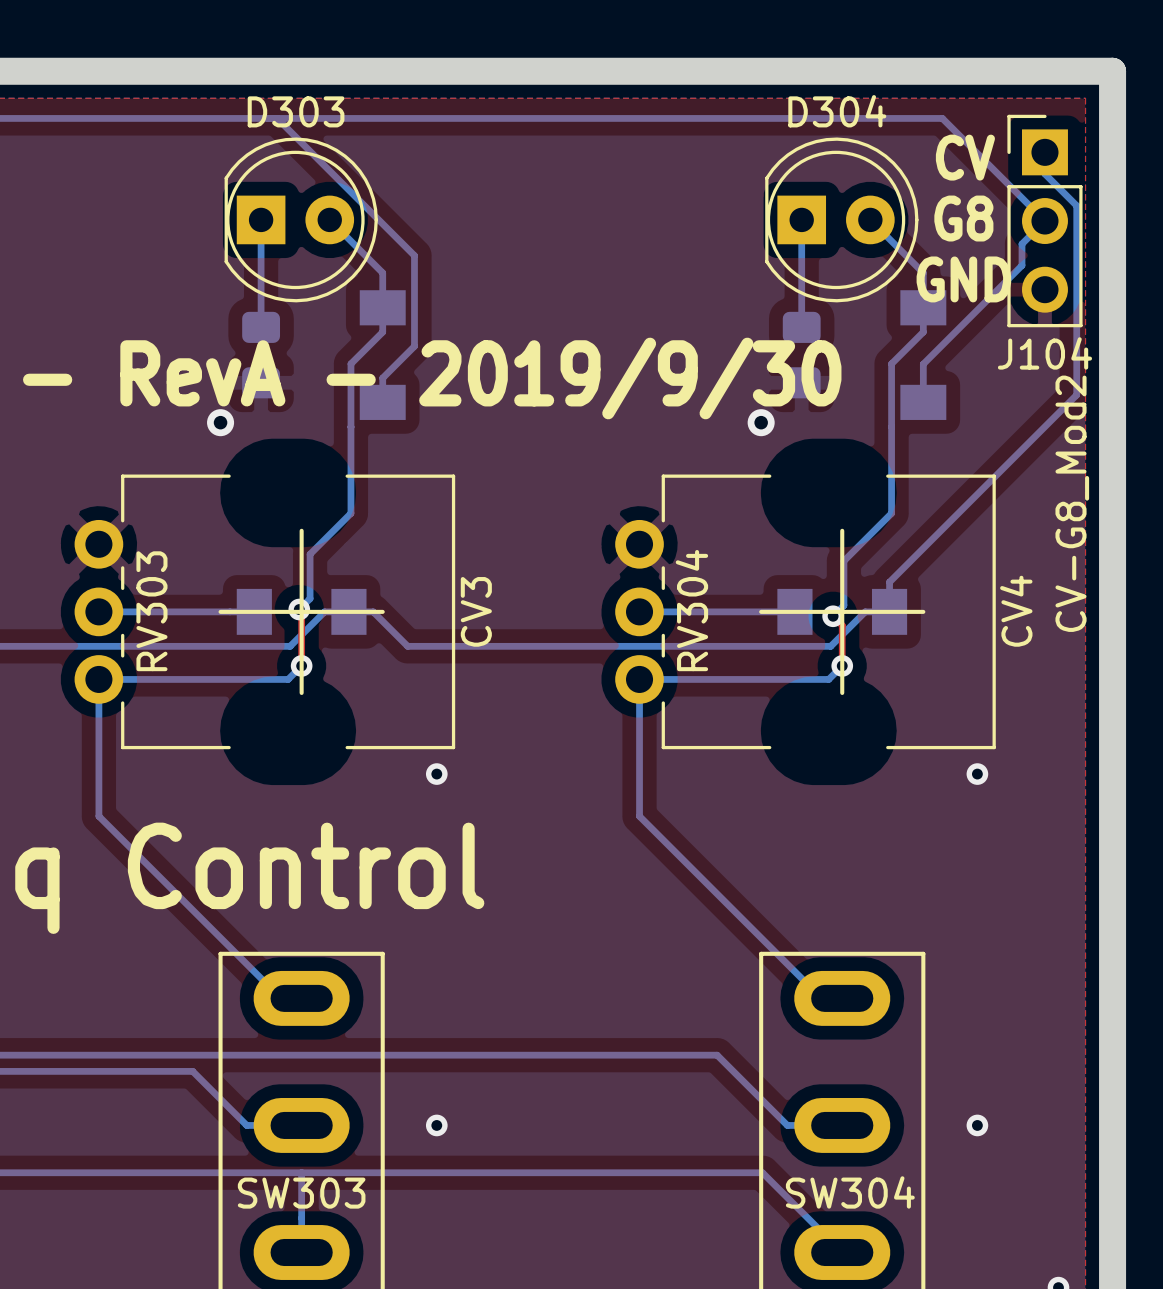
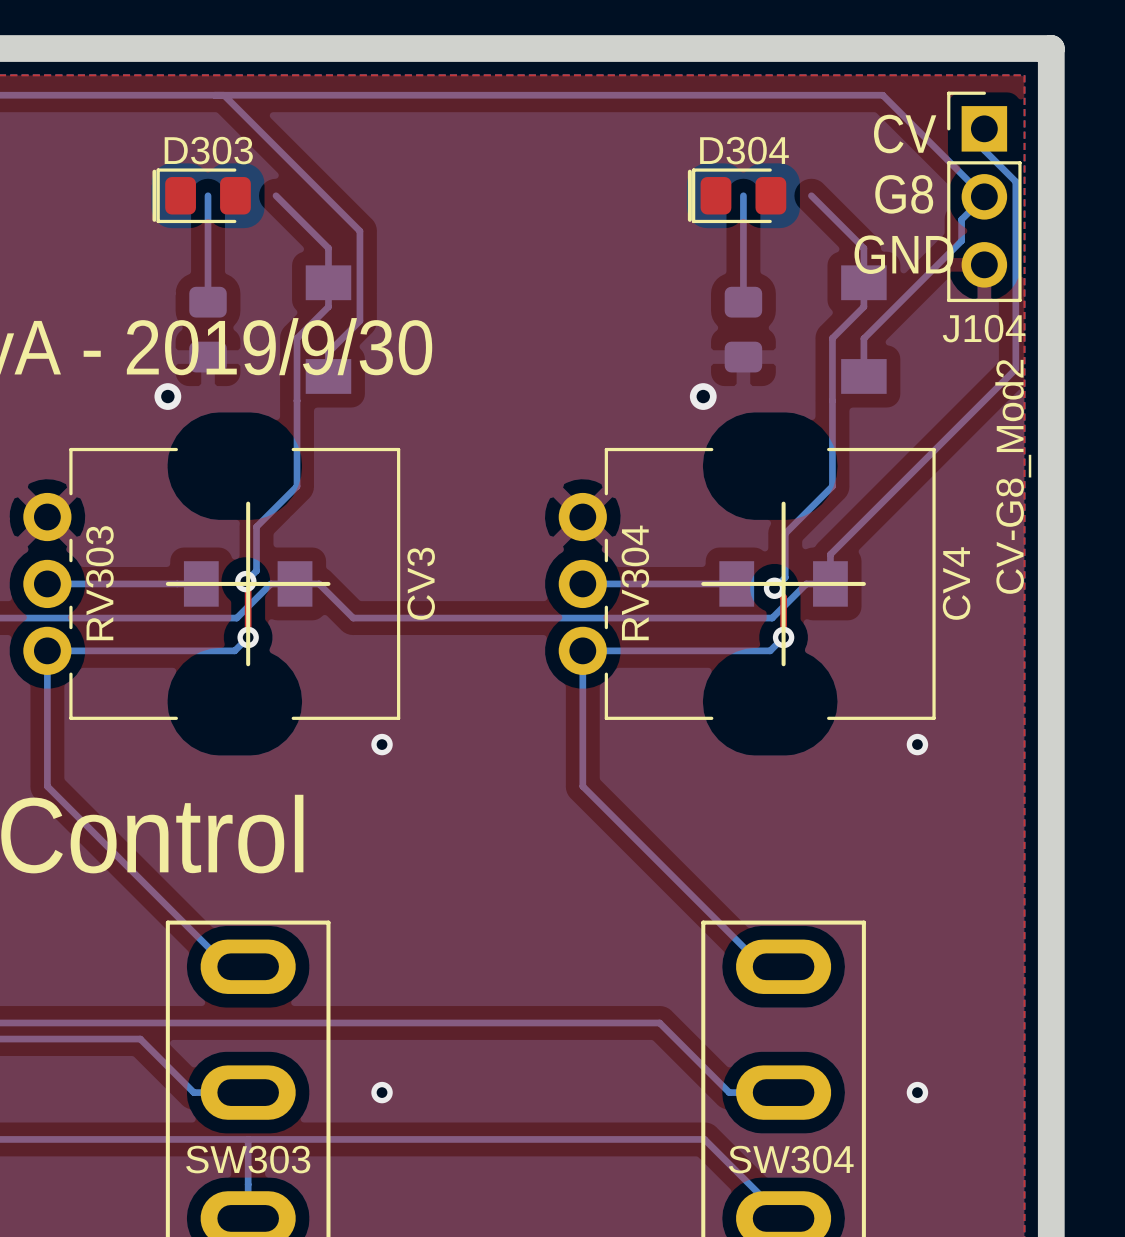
D303 name position: D303 (296, 111) -> D303 (208, 150)
D304 name position: D304 (837, 111) -> D304 (744, 150)
D303 footprint: [224, 137, 378, 303] -> [152, 168, 251, 224]
D304 footprint: [765, 137, 919, 303] -> [687, 168, 787, 224]

